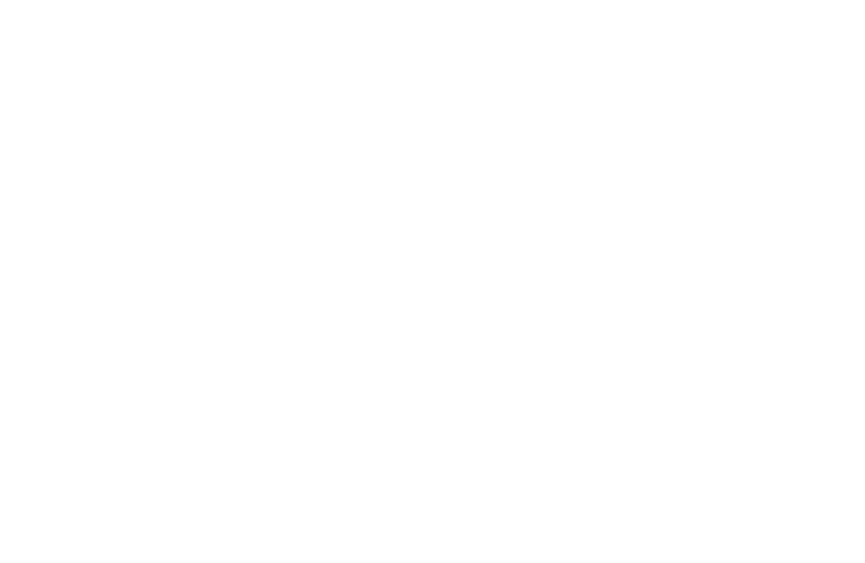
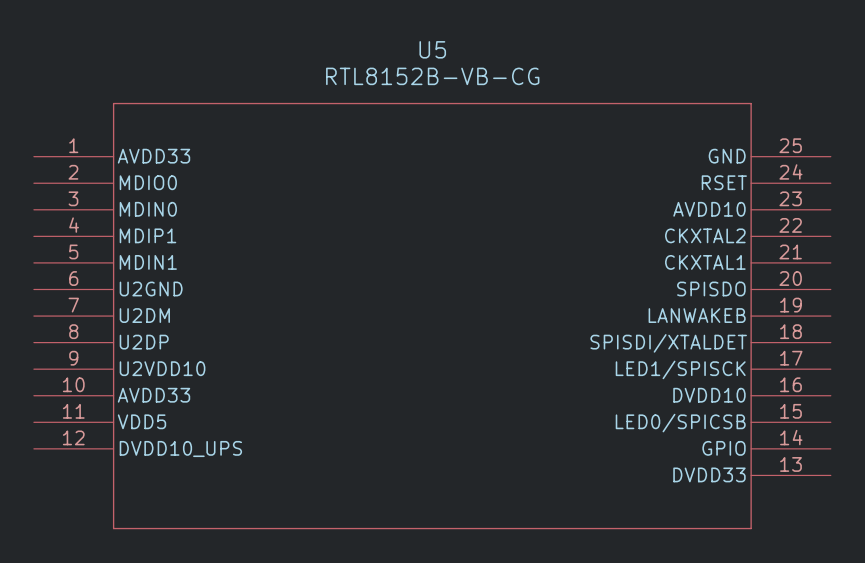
U5: none -> RTL8152B-VB-CG (432, 316)

